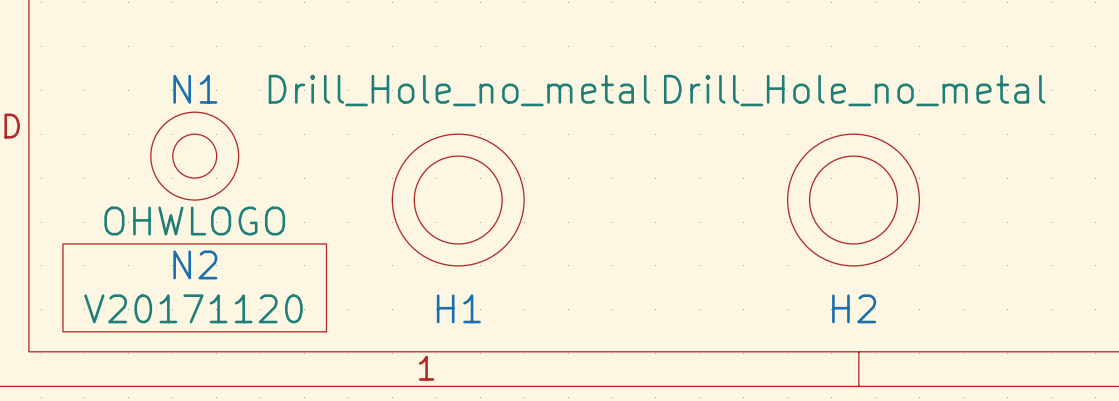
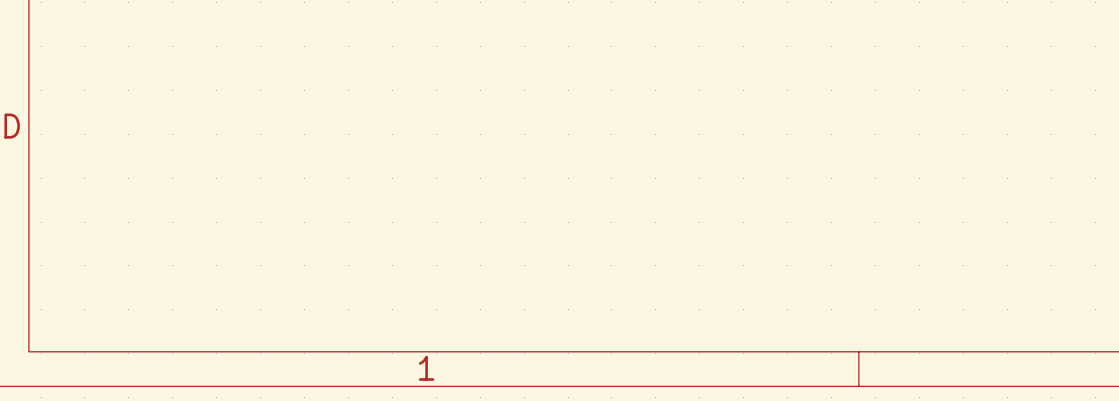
N1: OHWLOGO (194, 156) -> none
H1: Drill_Hole_no_metal (458, 200) -> none
H2: Drill_Hole_no_metal (853, 200) -> none
N2: V20171120 (194, 287) -> none

